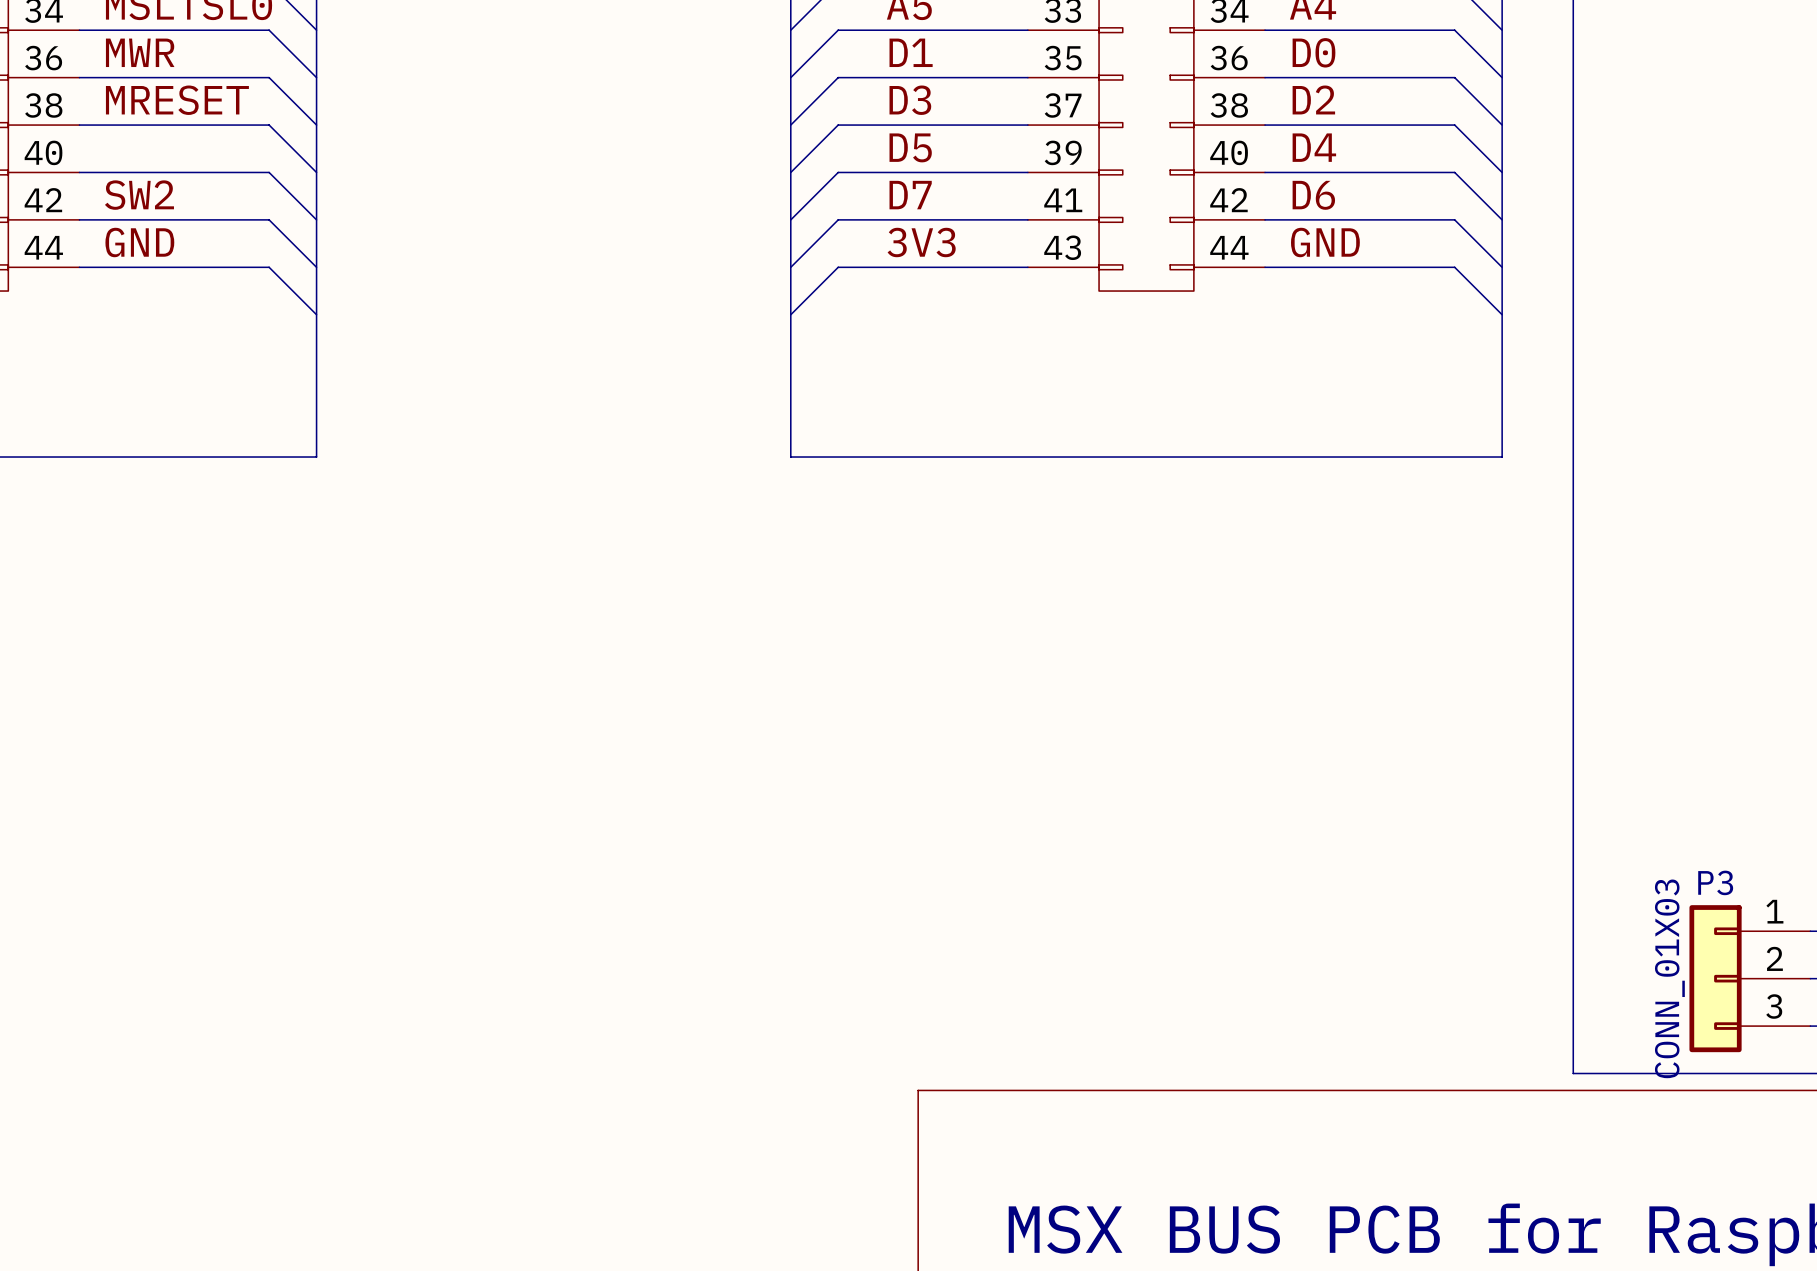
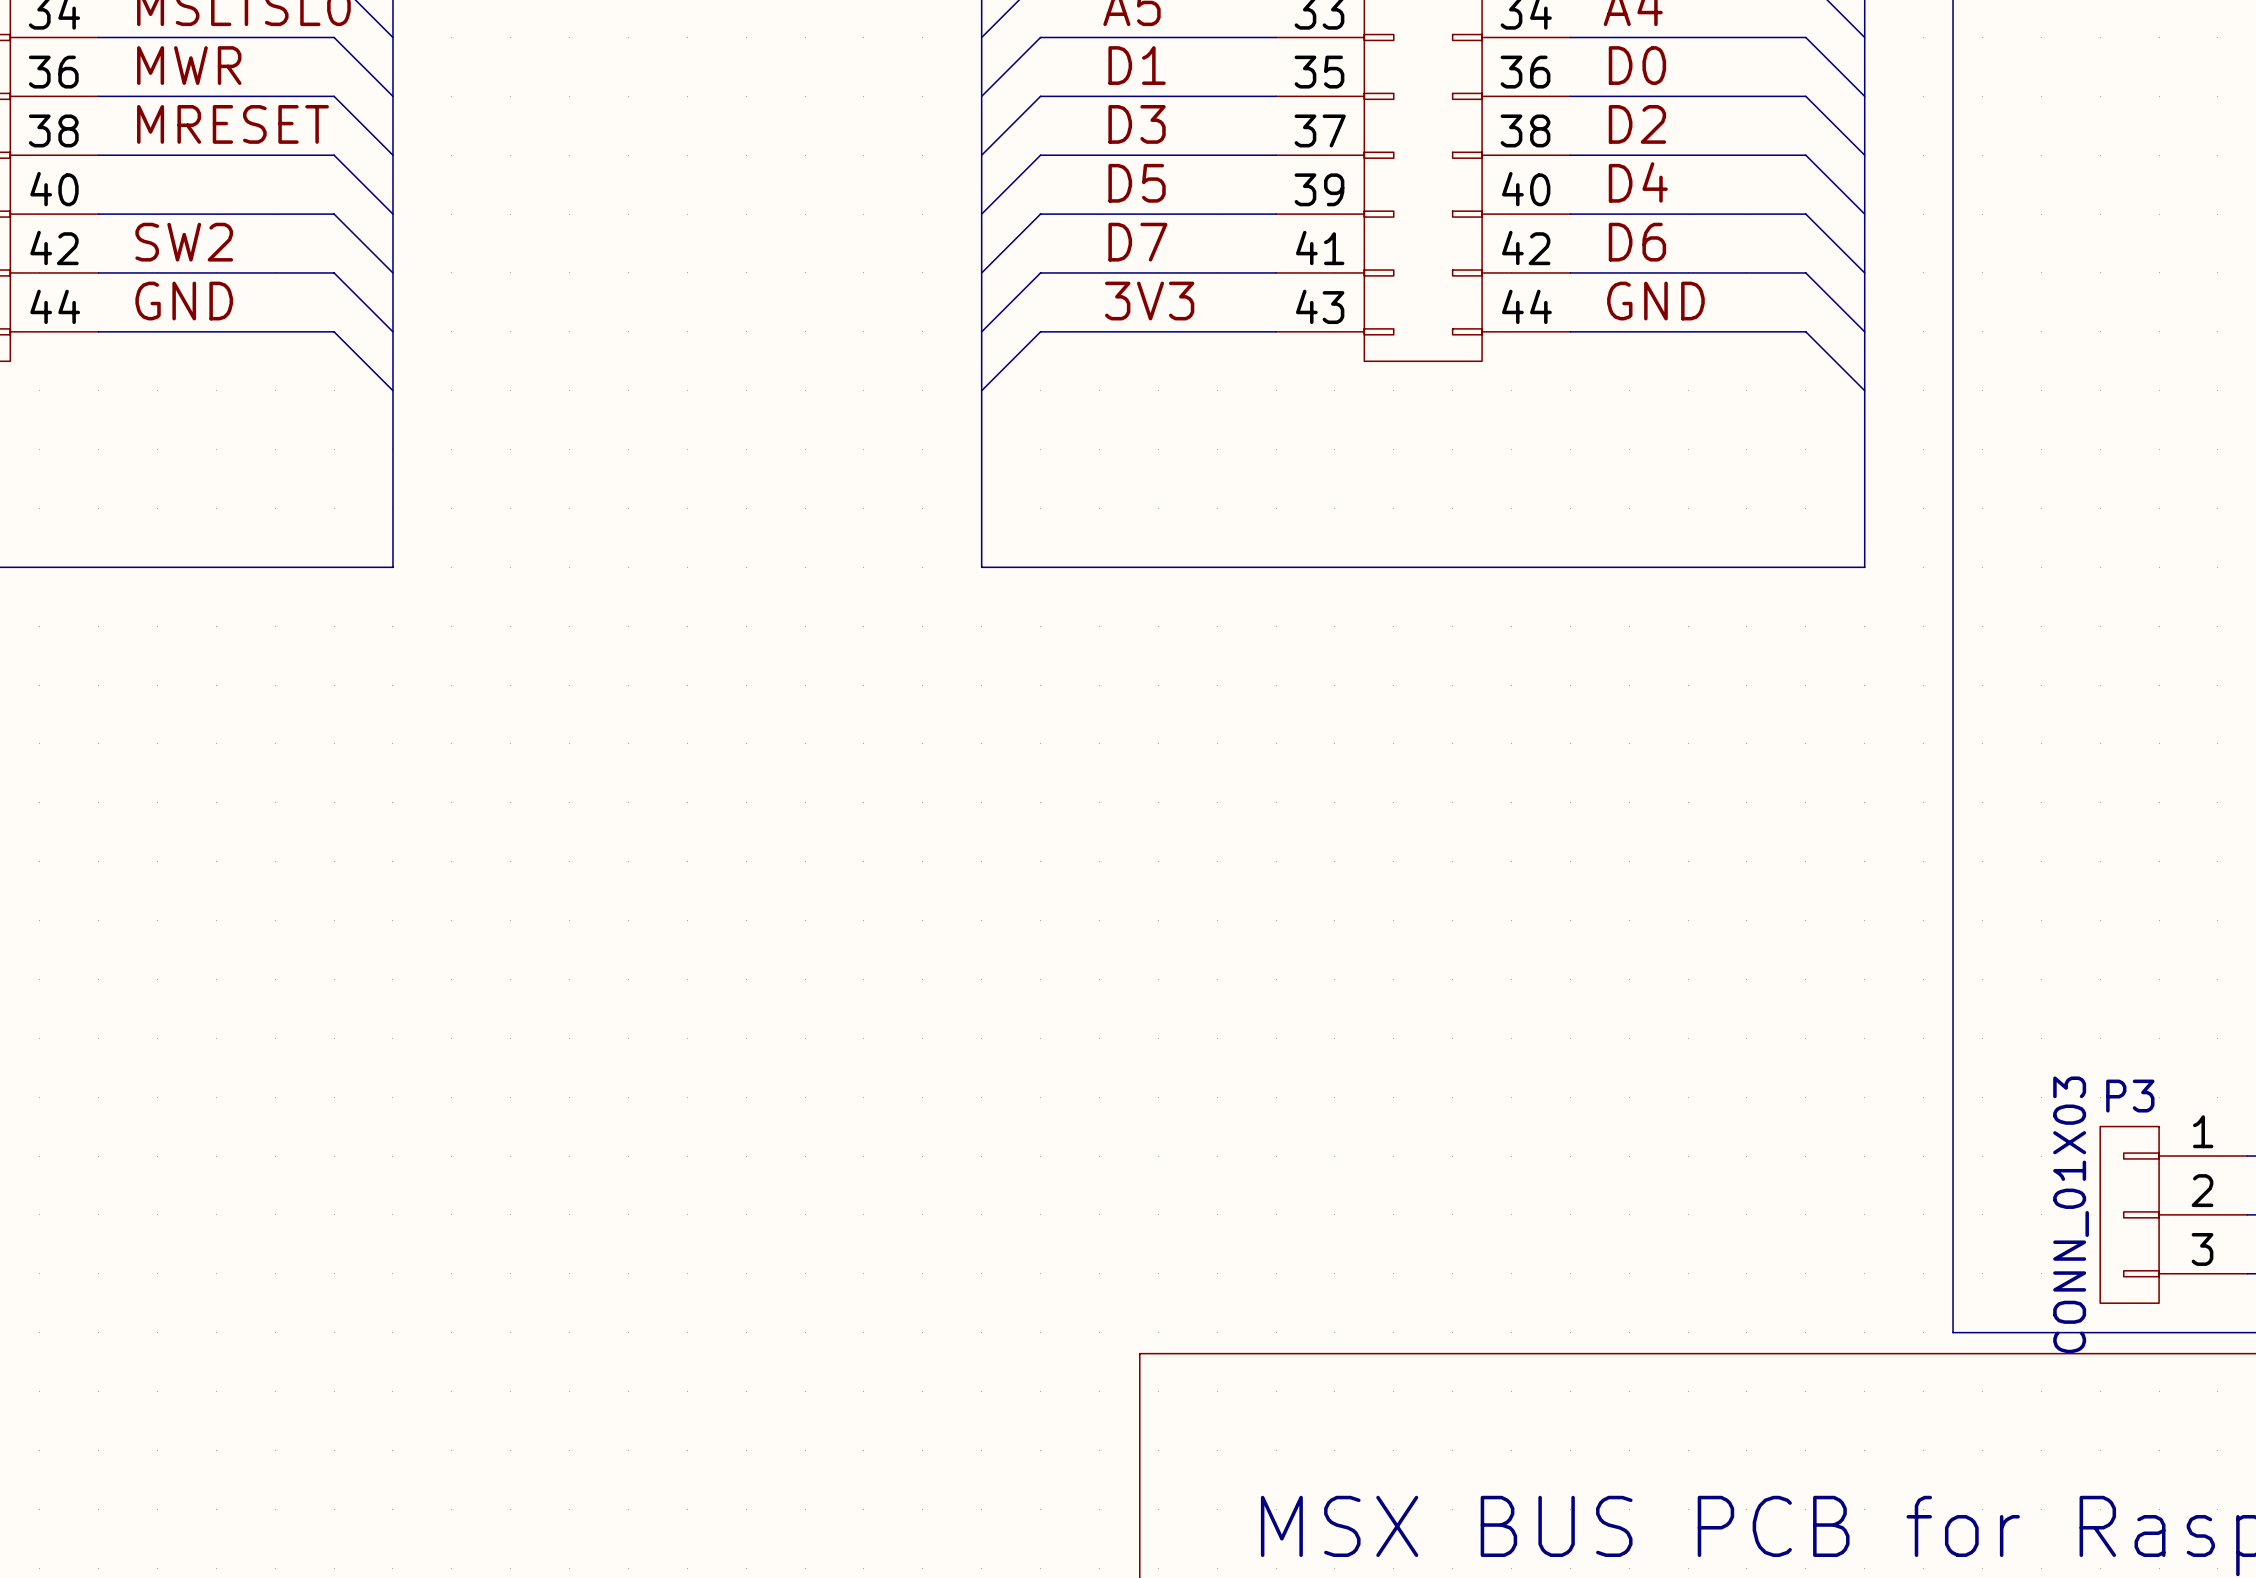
P3 symbol: [1689, 905, 1811, 1053] -> [2100, 1126, 2248, 1304]

